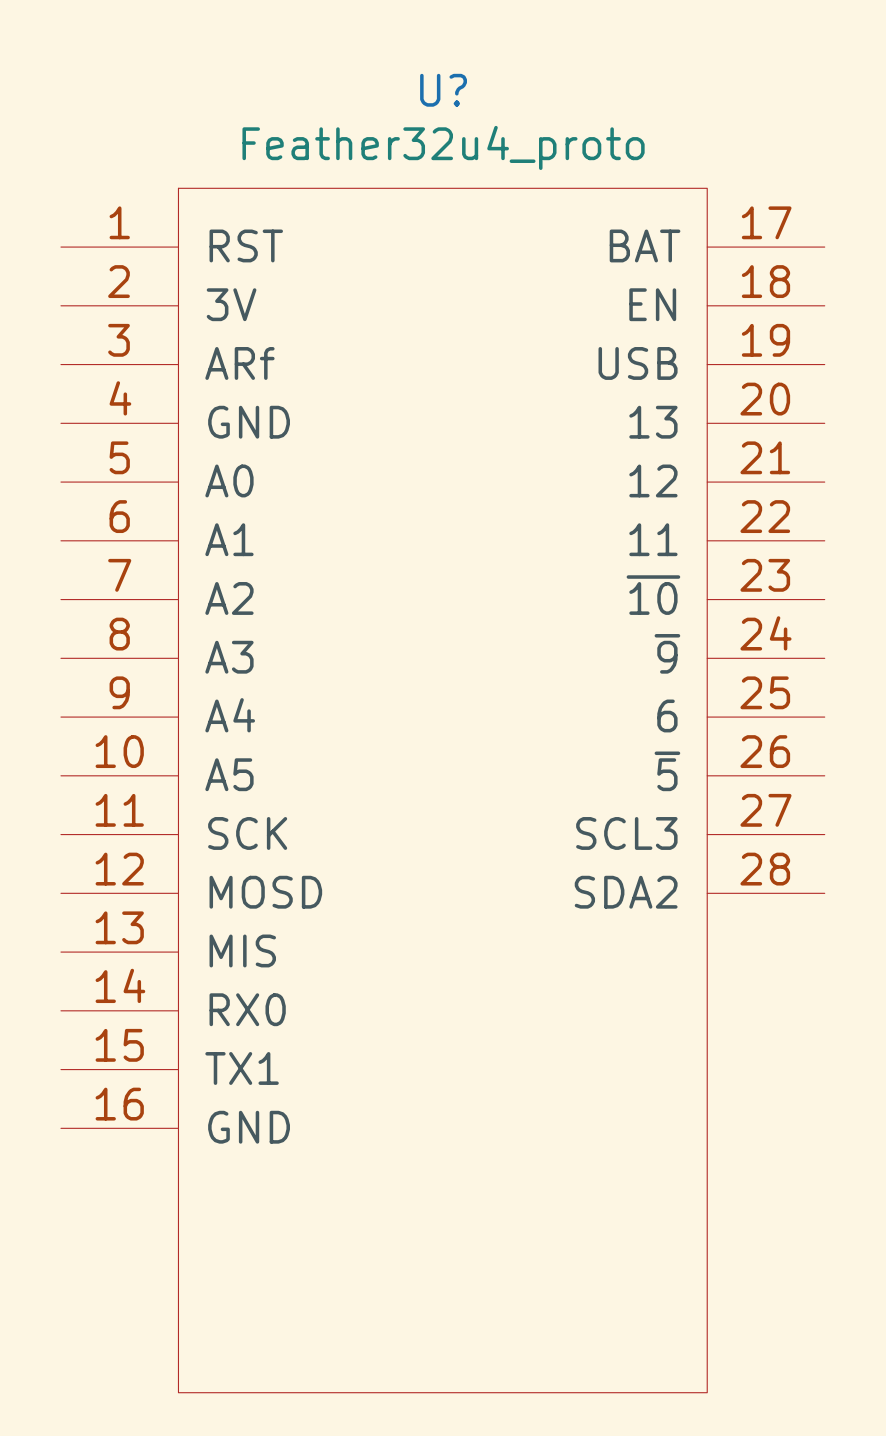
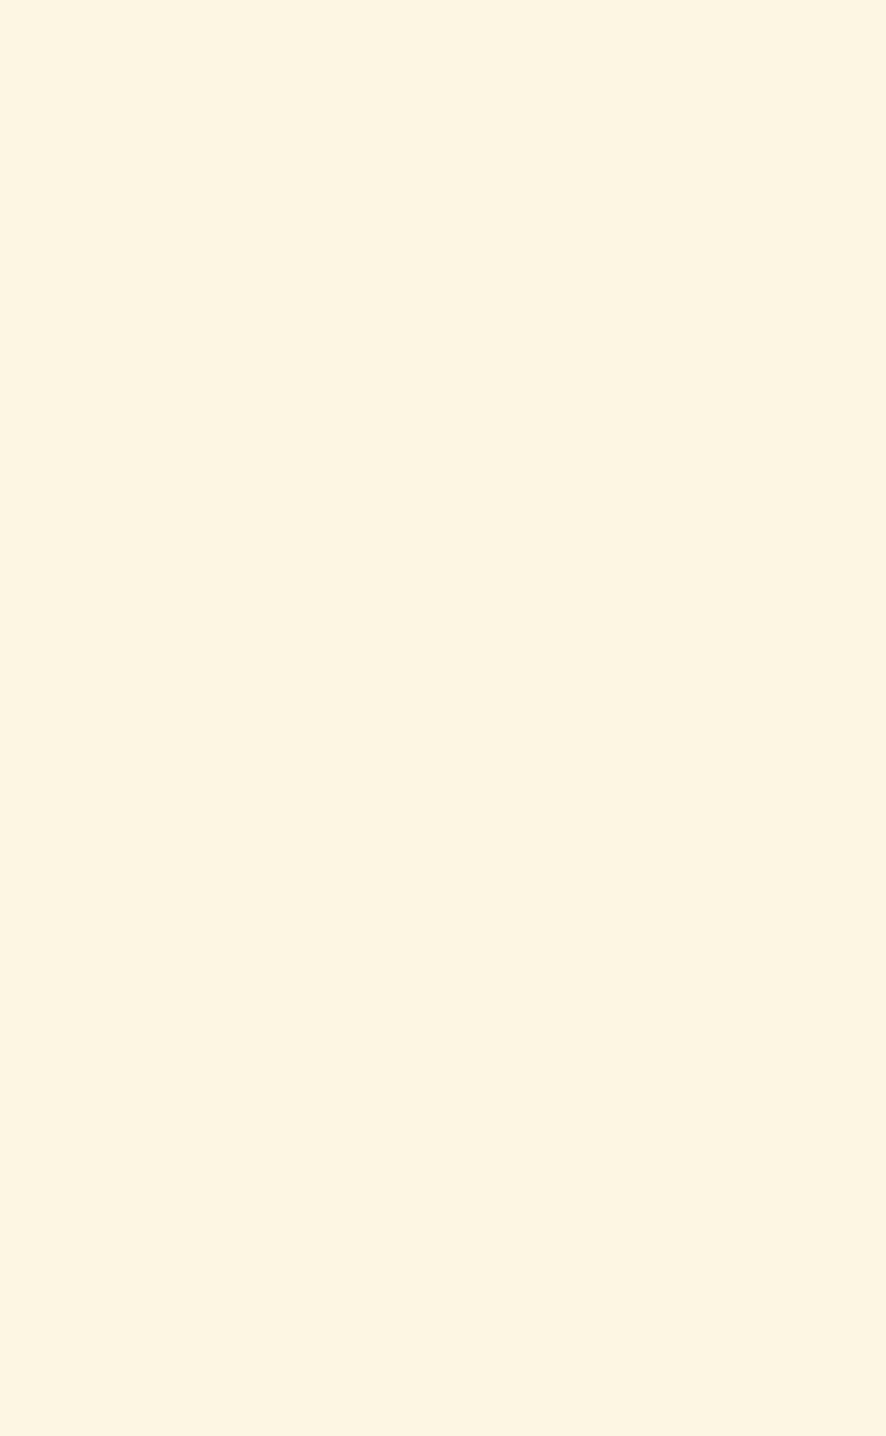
U?: Feather32u4_proto (442, 790) -> none

